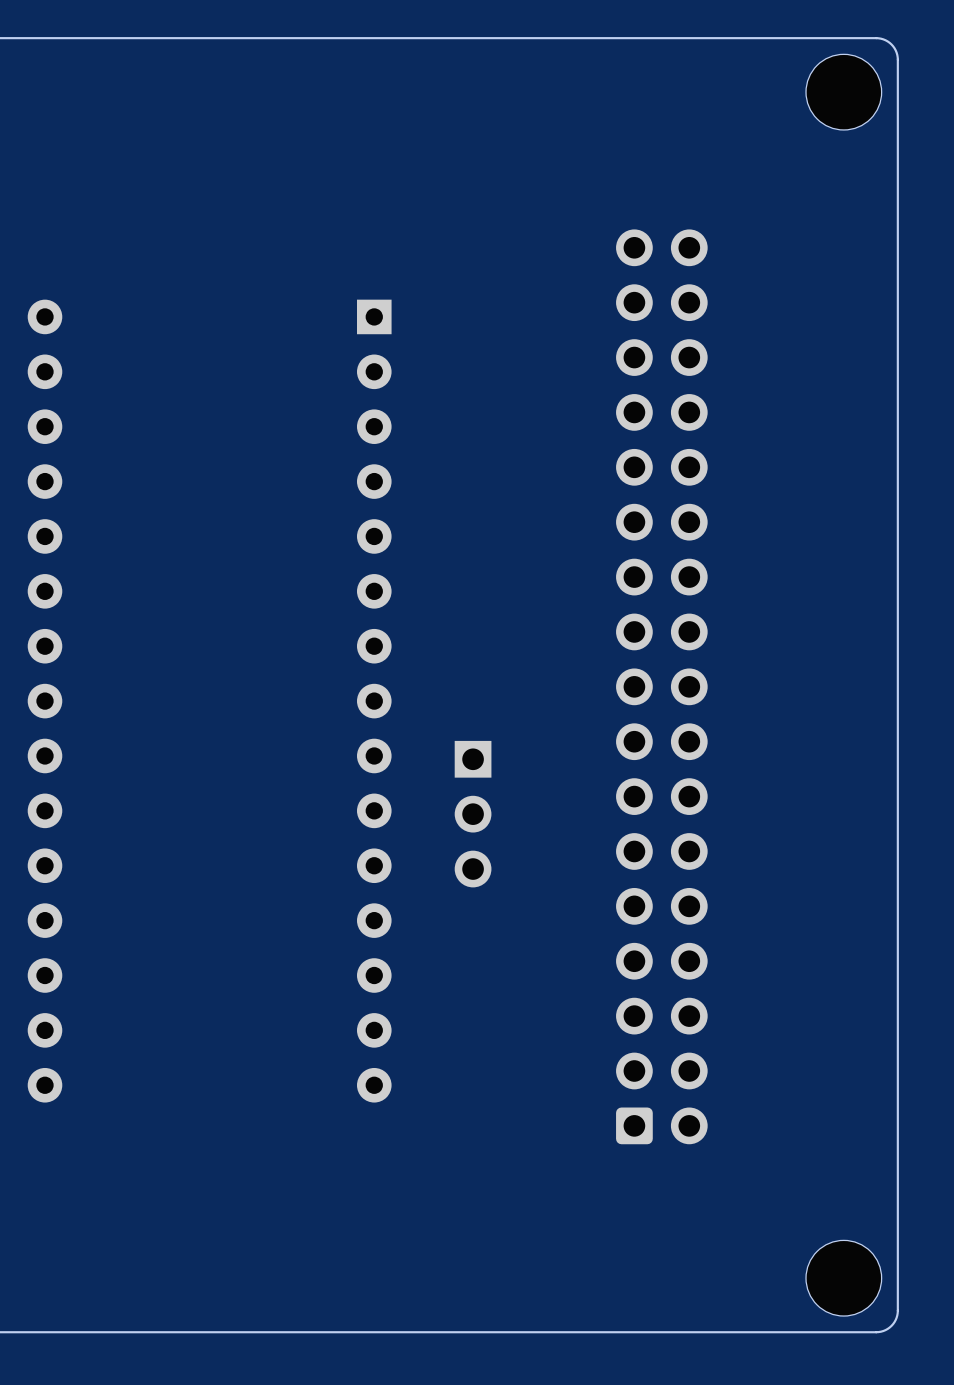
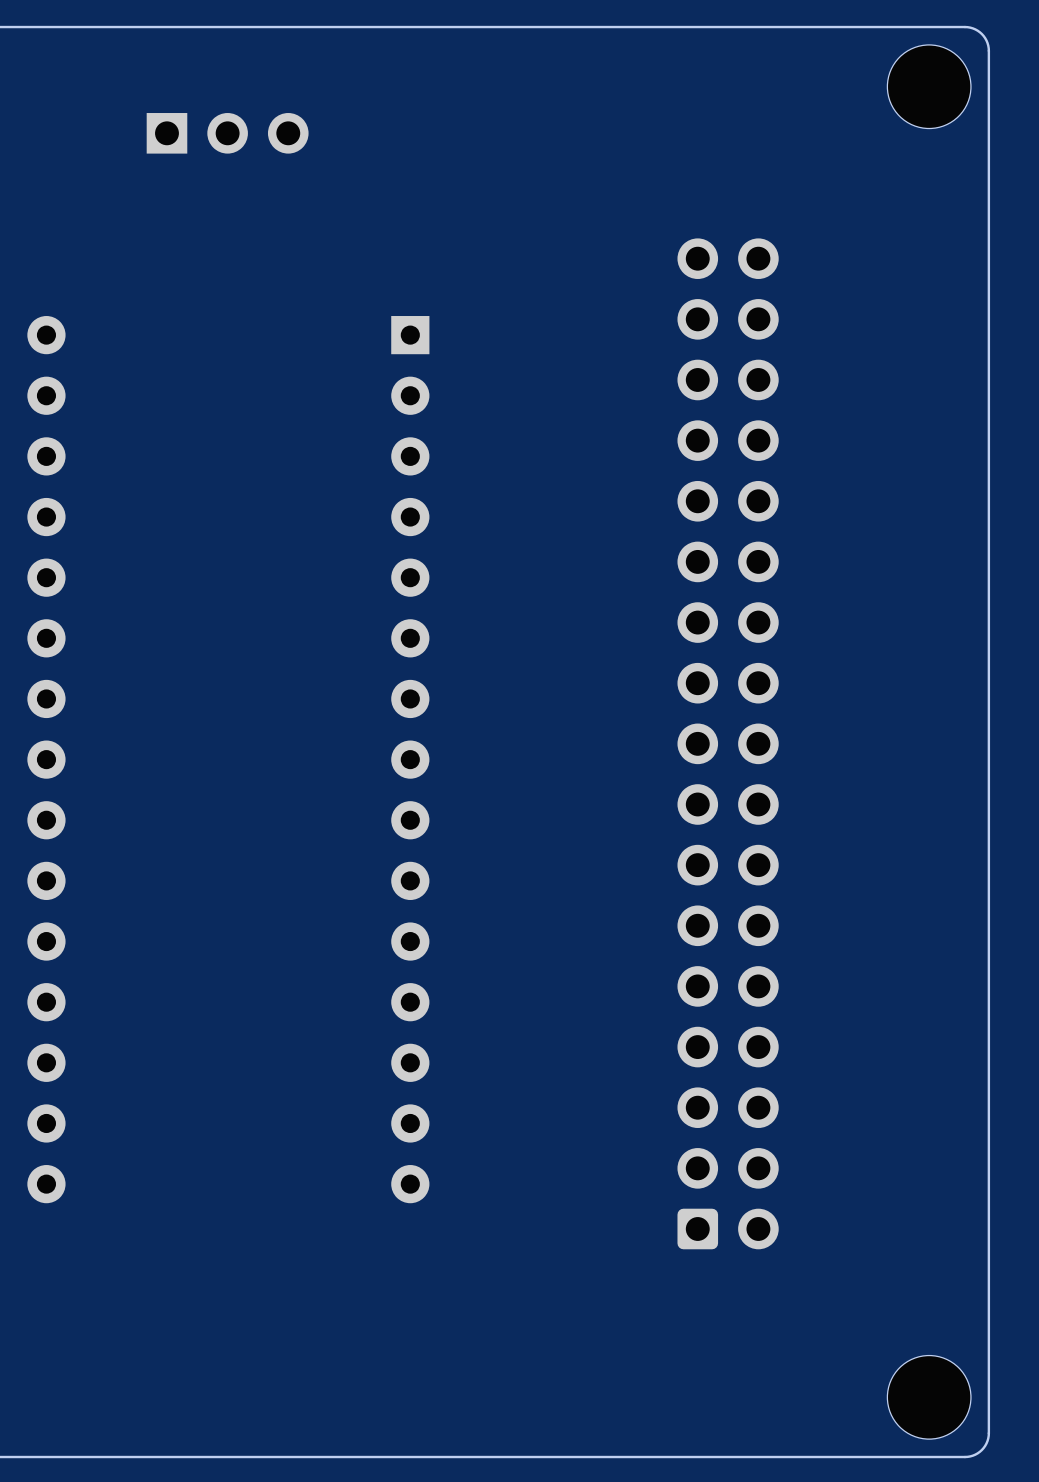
part: none -> (227, 133)
part: (473, 814) -> none

